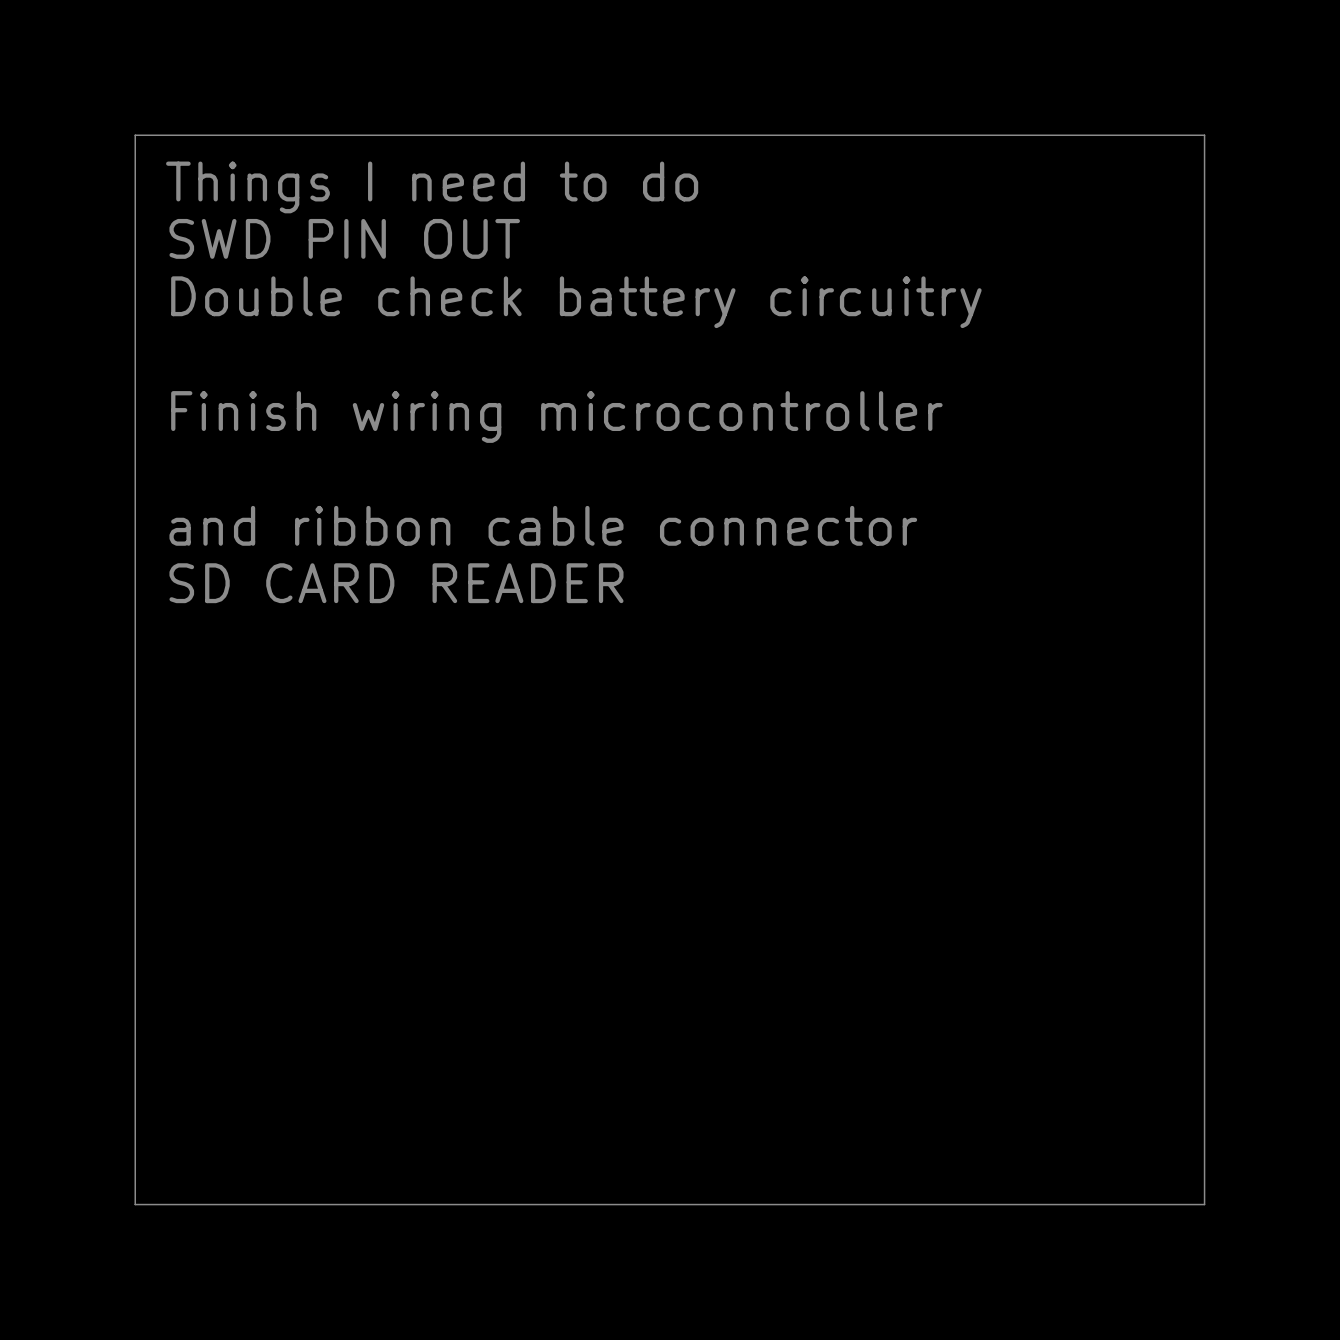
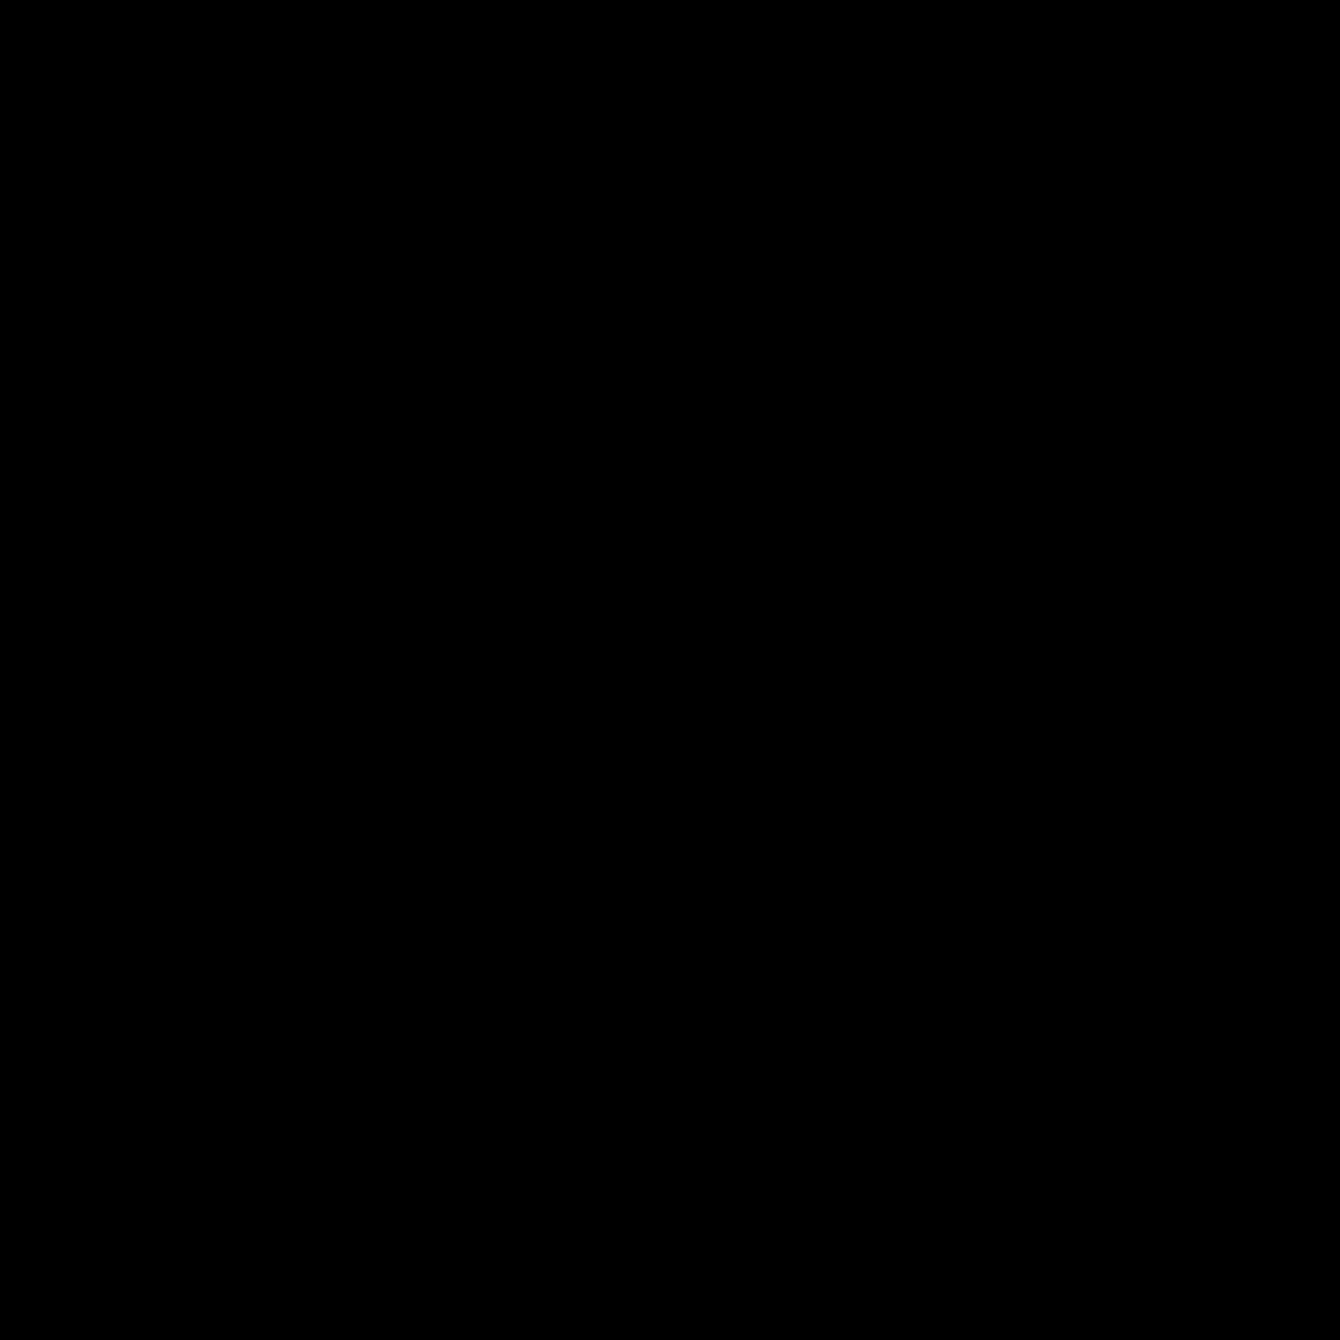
line: (135, 135) (1204, 135) (1204, 1204) (135, 1204) (135, 135) -> none
text: Things I need to do (432, 187) -> none
text: SWD PIN OUT (344, 238) -> none
text: Double check battery circuitry (576, 302) -> none
text: Finish wiring microcontroller (556, 416) -> none
text: and ribbon cable connector (543, 525) -> none
text: SD CARD READER (396, 583) -> none

